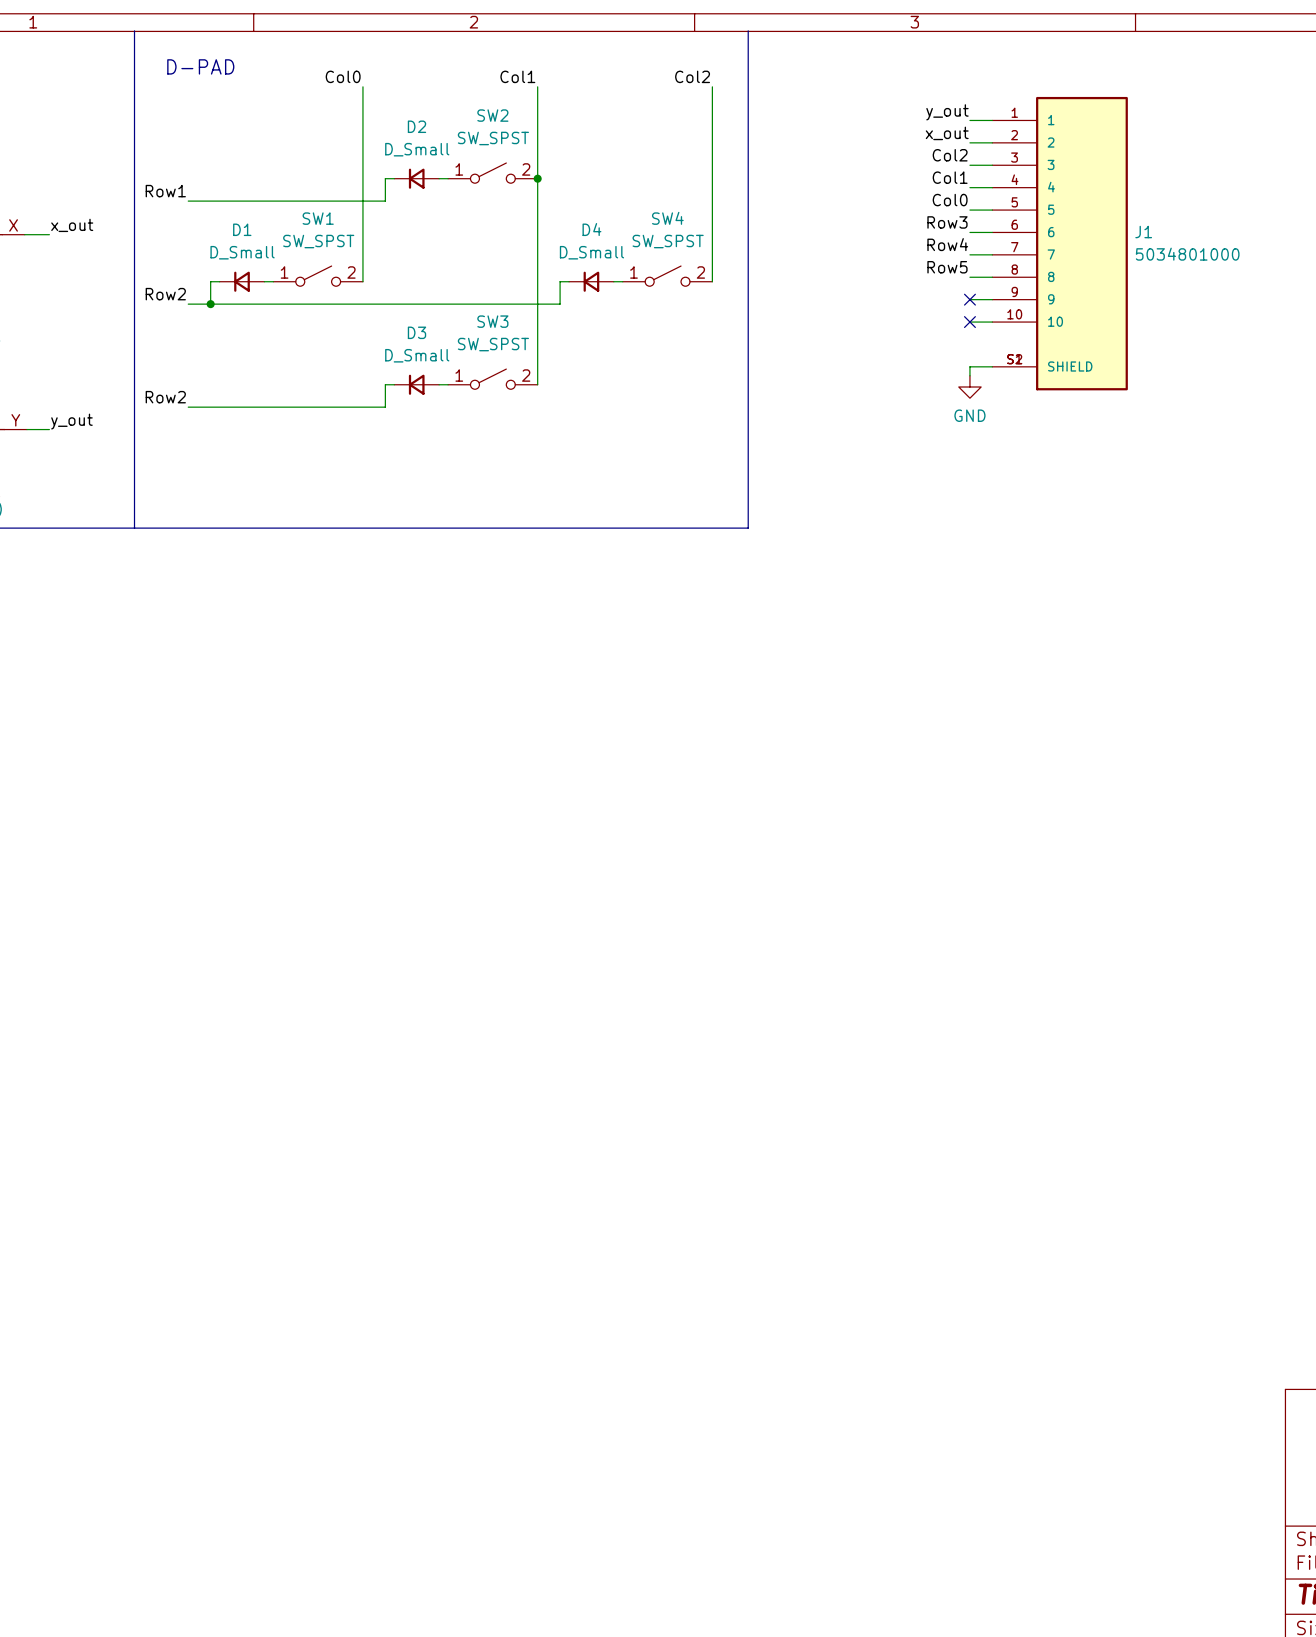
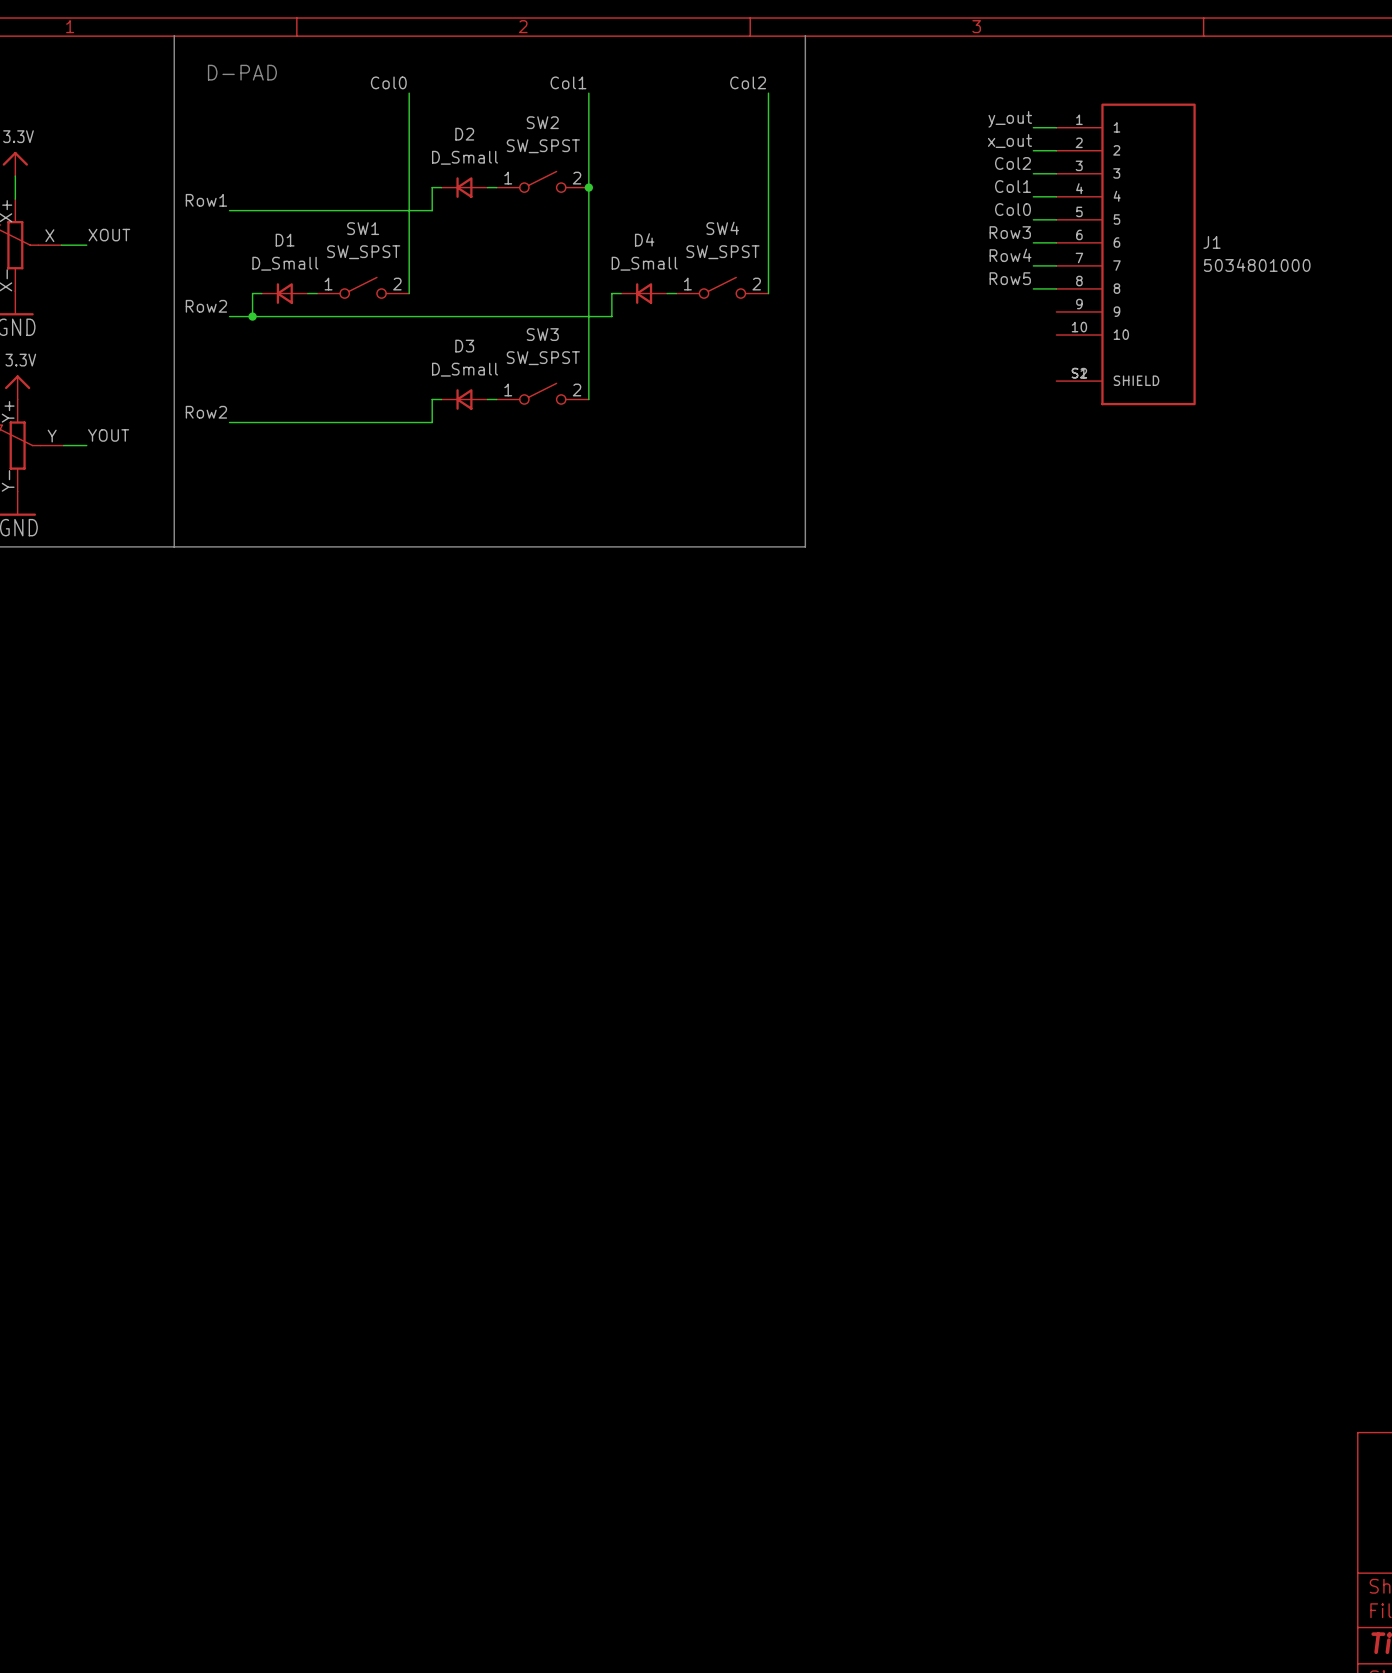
label: x_out (72, 225) -> XOUT (109, 235)
wire: (969, 299) (992, 299) -> none
no-connect mark: (969, 299) -> none
wire: (969, 322) (992, 322) -> none
no-connect mark: (969, 322) -> none
wire: (992, 366) (969, 366) (969, 375) -> none
power symbol: GND (969, 387) -> none
label: y_out (71, 421) -> YOUT (108, 435)

